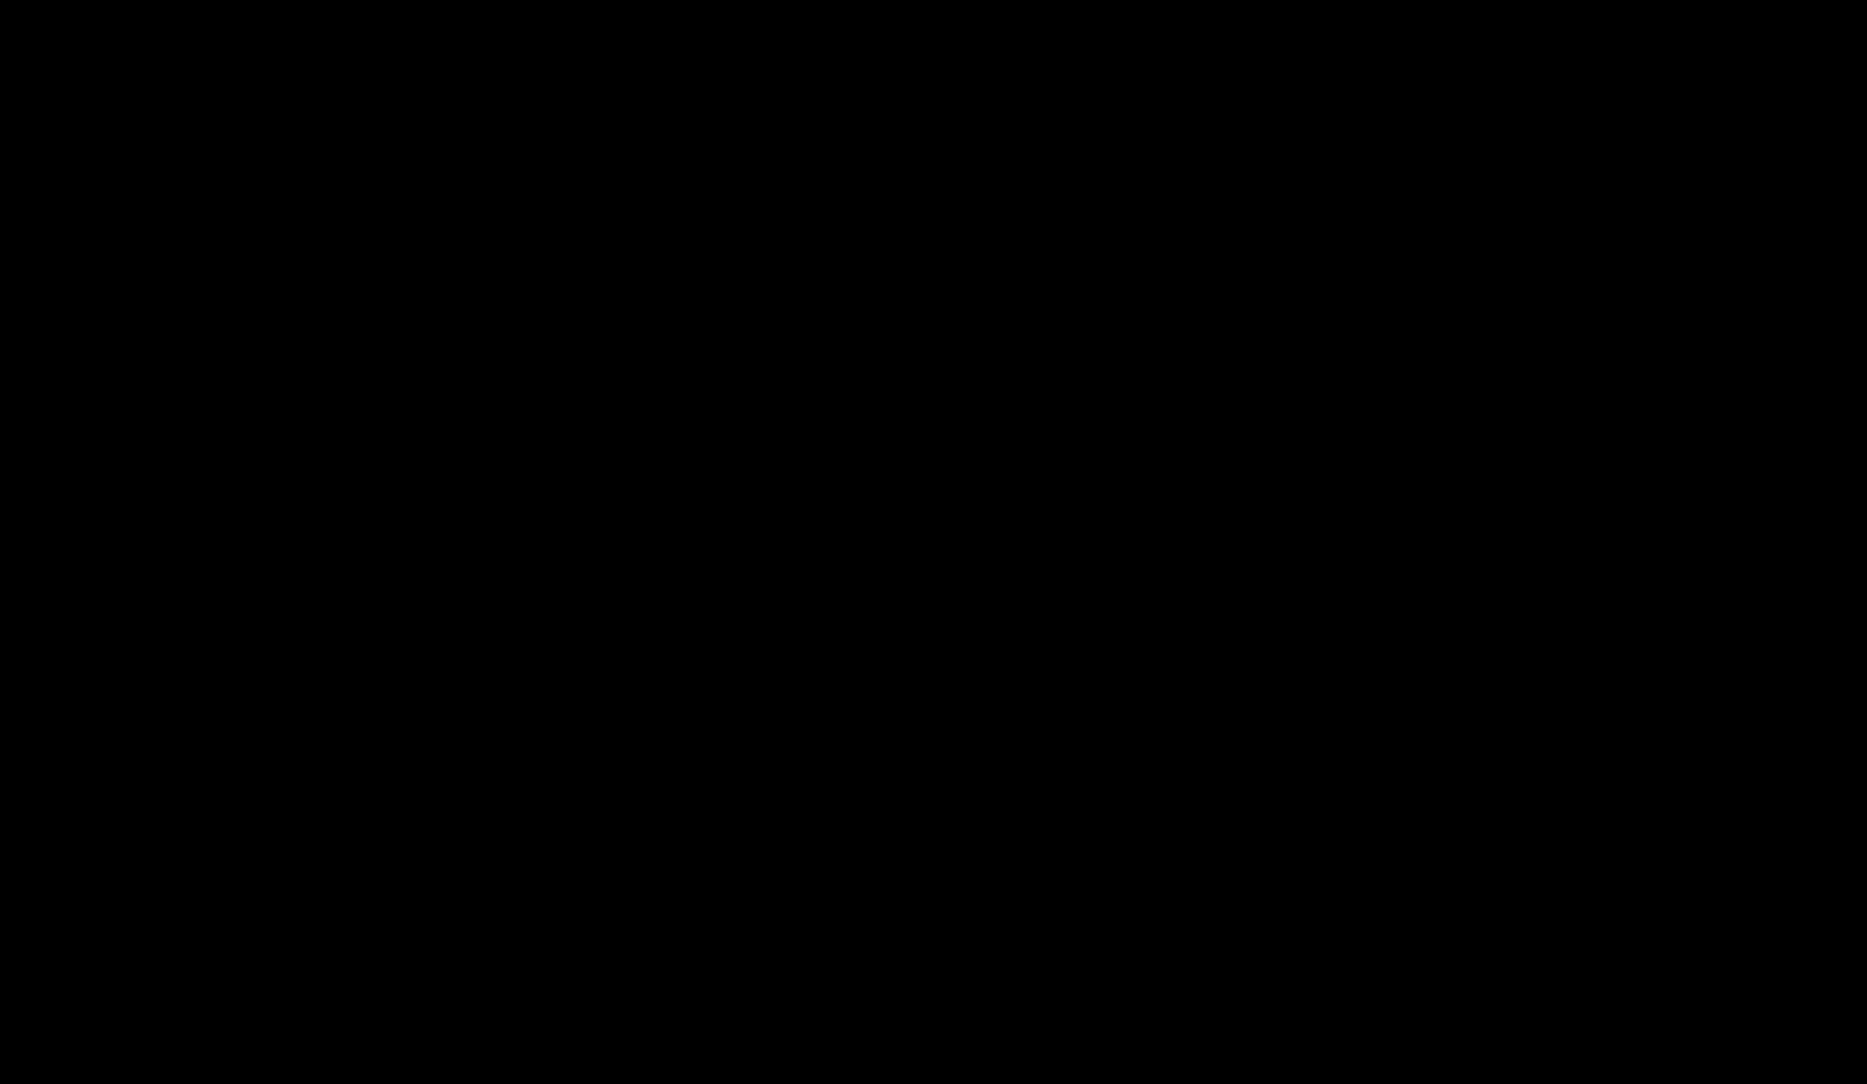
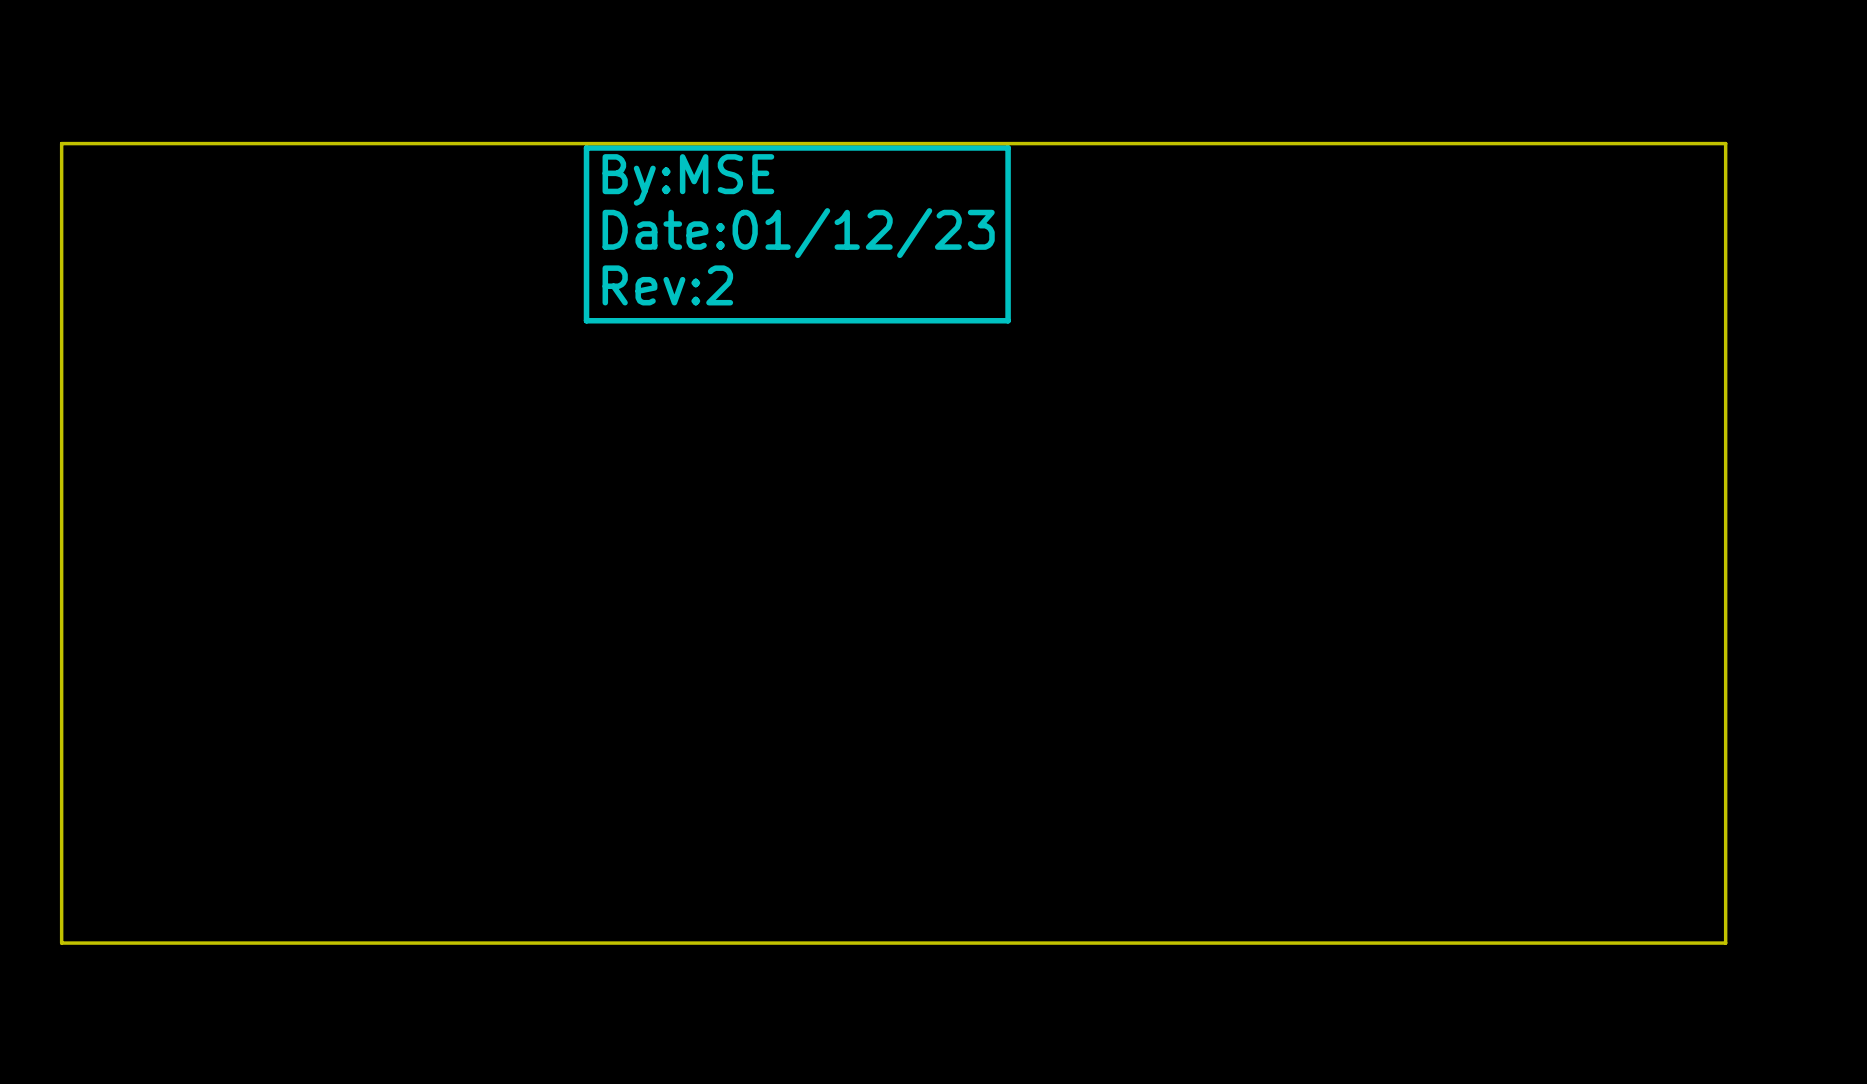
board edge: none -> (61, 143) (1725, 143) (1725, 943) (61, 943) (61, 143)
line: none -> (586, 147) (1008, 147) (1008, 320) (586, 320) (586, 147)
text: none -> By:MSE (688, 179)
text: none -> Date:01/12/23 (798, 233)
text: none -> Rev:2 (667, 285)

